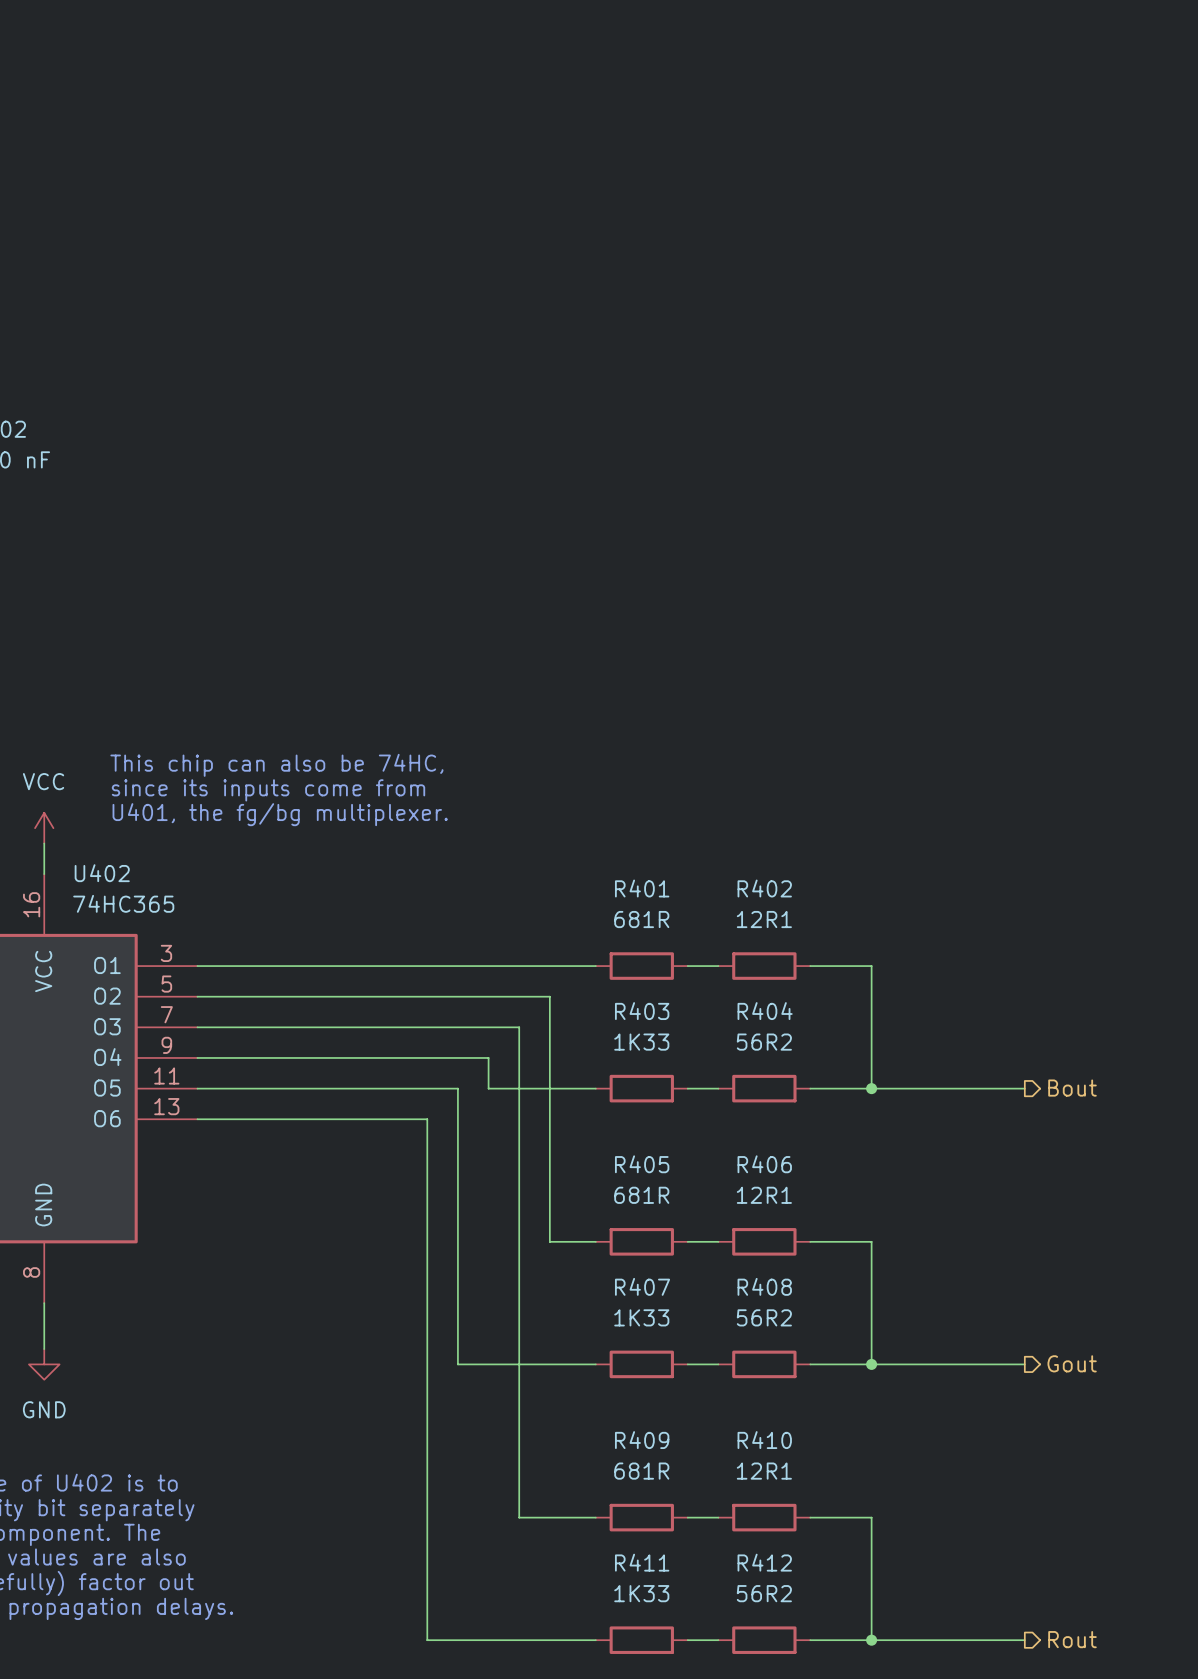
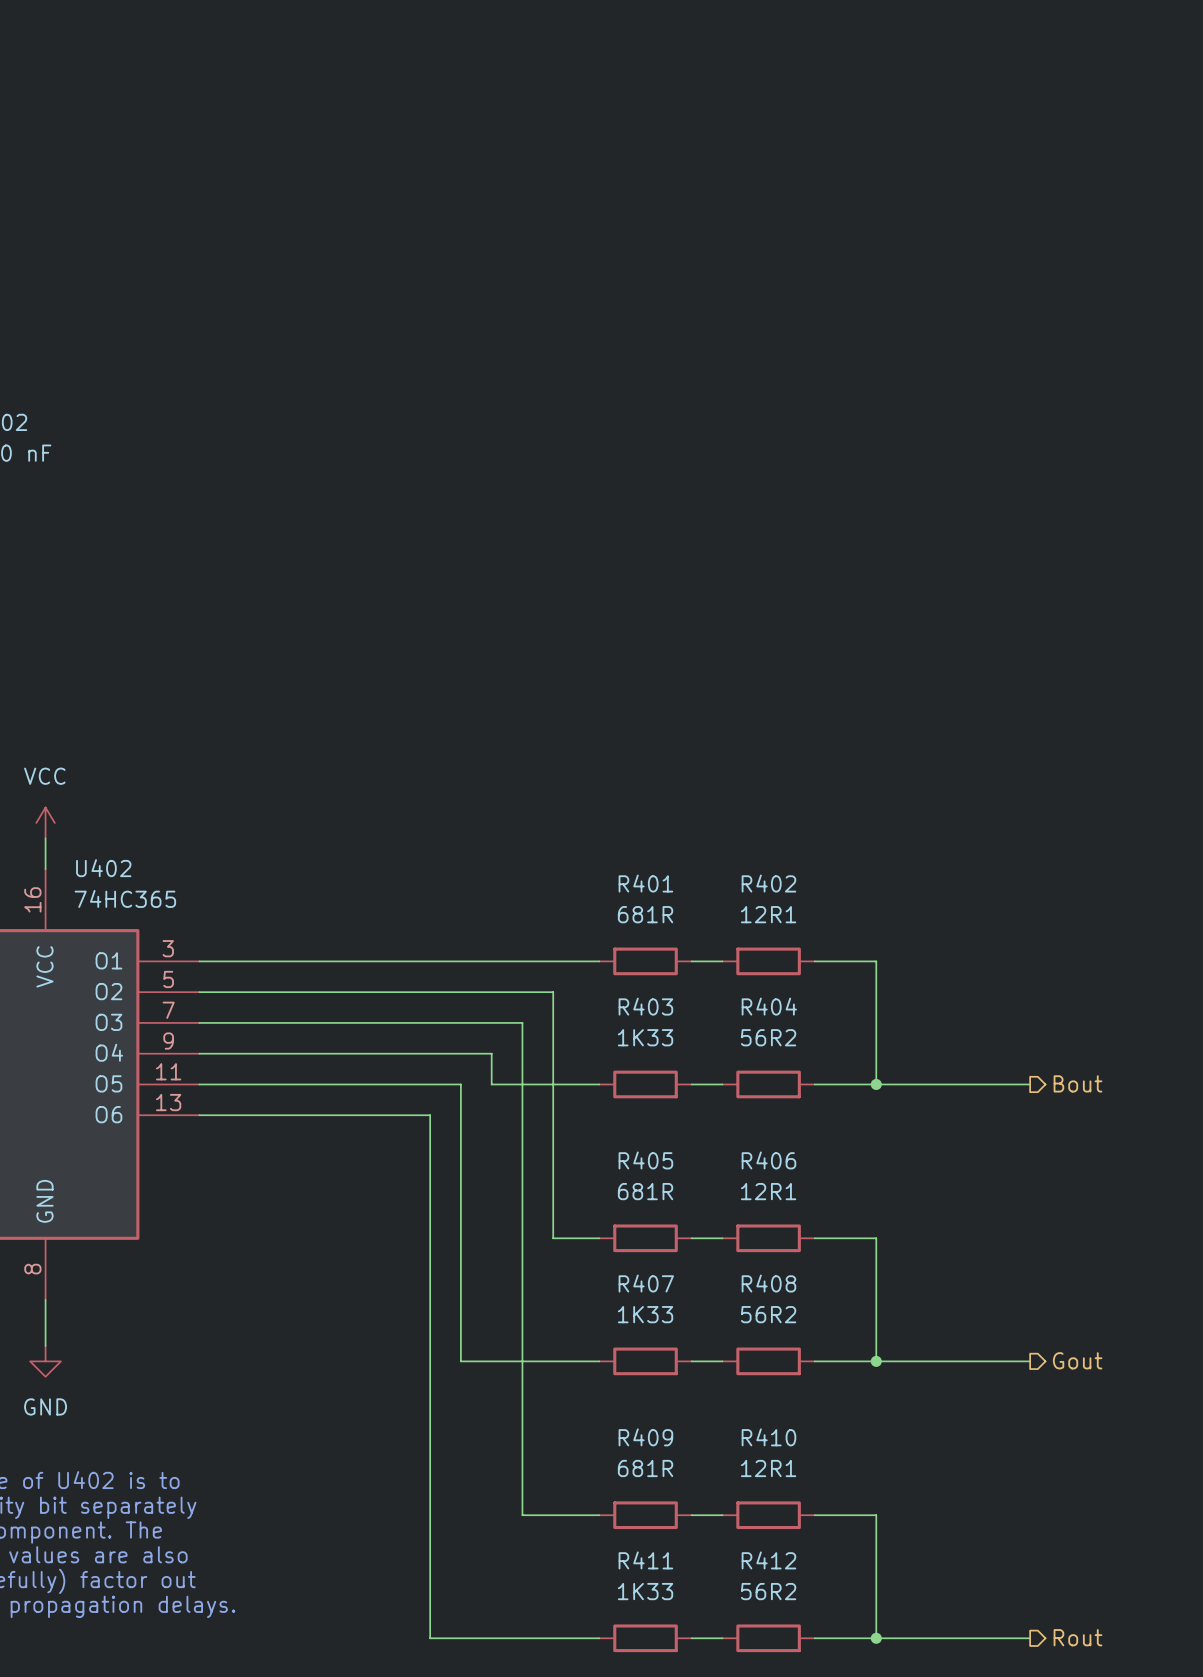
text: This chip can also be 74HC, (276, 765) -> none
text: since its inputs come from (268, 790) -> none
text: U401, the fg/bg multiplexer. (280, 814) -> none

